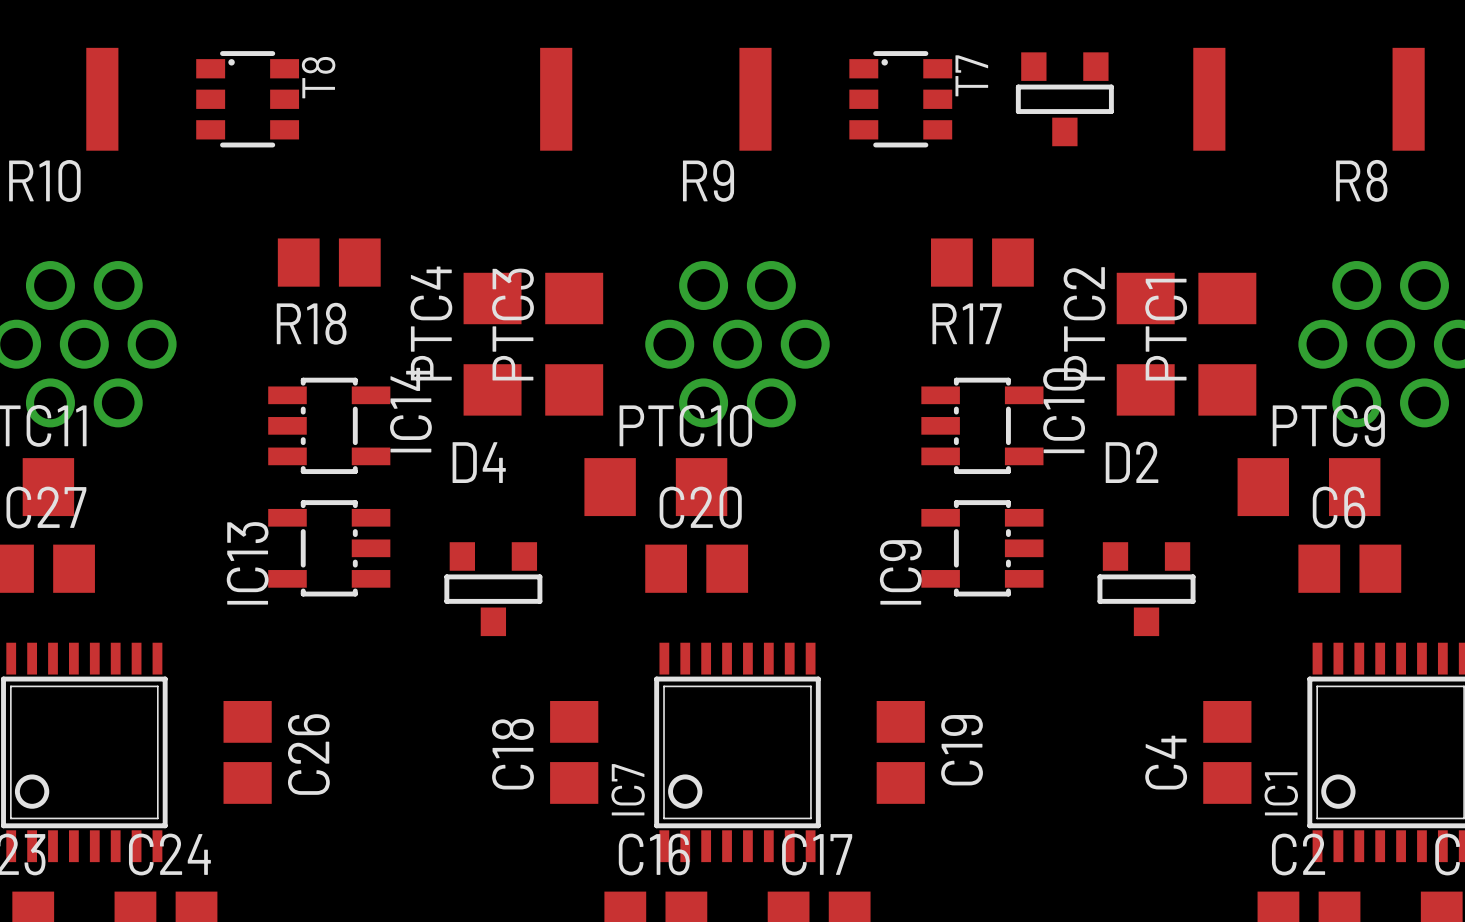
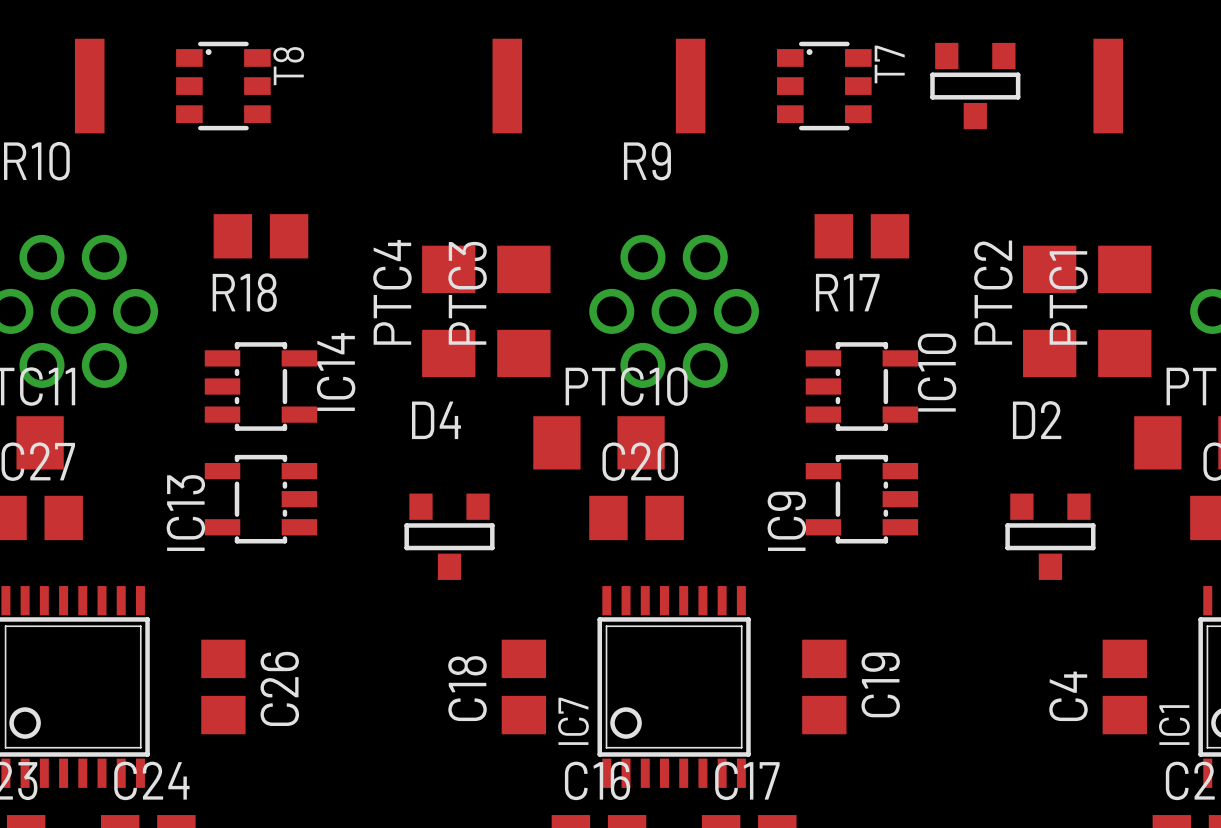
R18 position: (329, 262) -> (260, 236)
R17 position: (982, 262) -> (861, 236)
IC14 position: (329, 425) -> (260, 386)
IC10 position: (982, 425) -> (861, 386)
IC13 position: (329, 548) -> (260, 499)
IC9 position: (982, 548) -> (861, 499)

